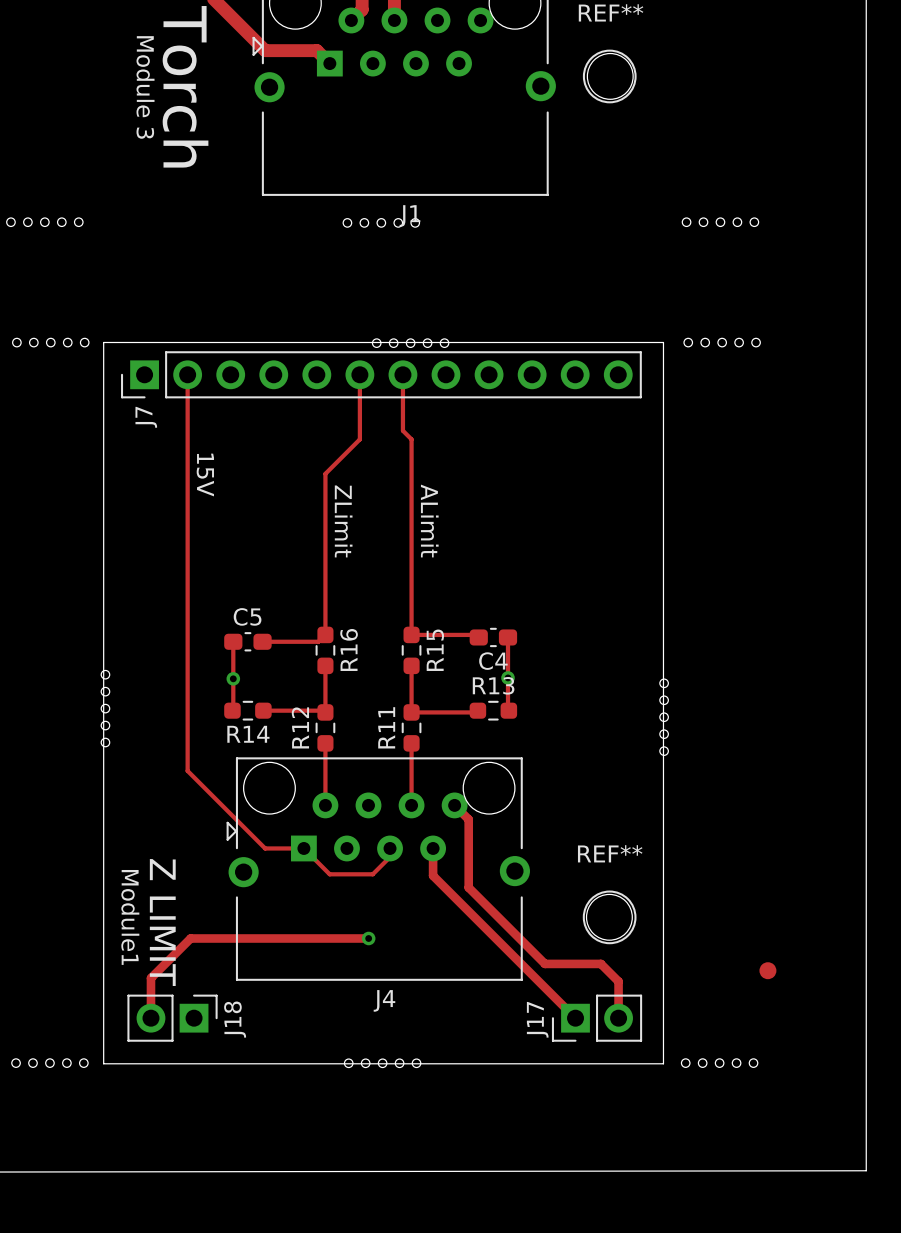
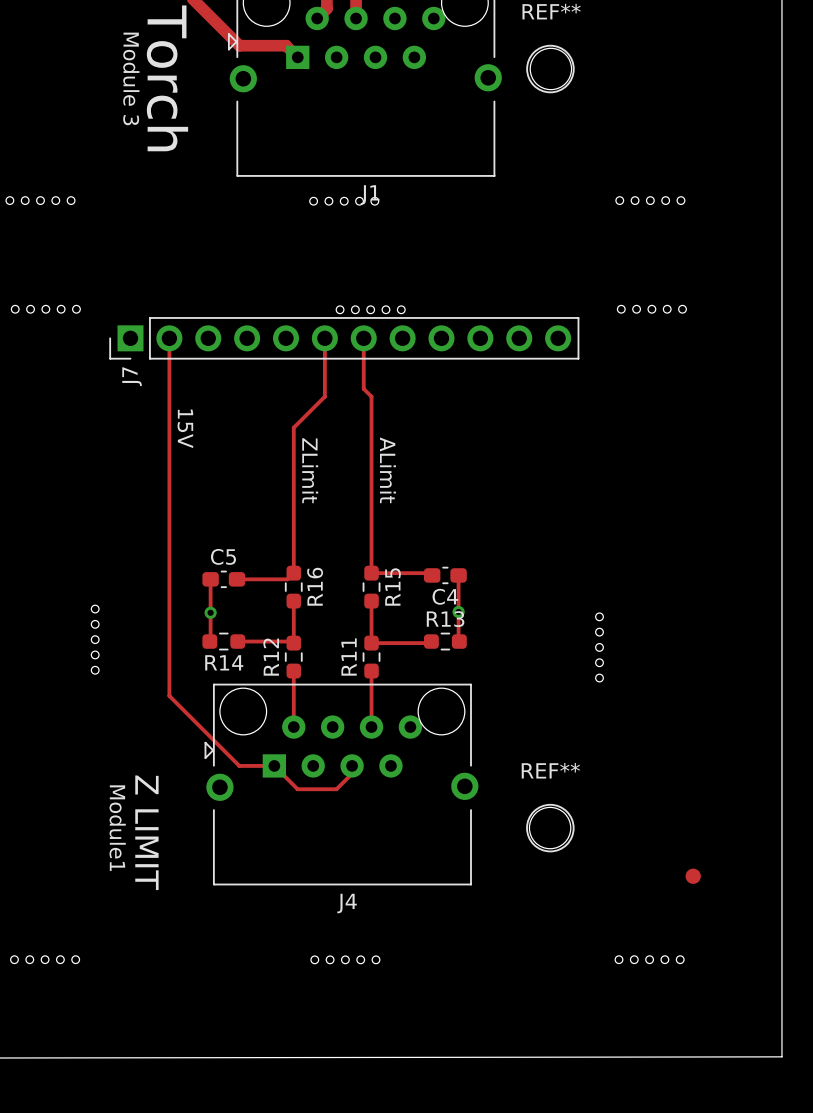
board edge: (103, 342) (103, 1063) (663, 1063) (663, 342) (103, 342) -> none
track: (454, 805) (468, 819) (468, 887) (544, 963) (600, 963) (618, 981) (618, 1018) -> none
track: (433, 848) (433, 875) (575, 1018) -> none
track: (368, 938) (190, 938) (150, 978) (150, 1018) -> none
via: (368, 938) -> none
J18: (172, 1018) -> none
J17: (597, 1018) -> none

